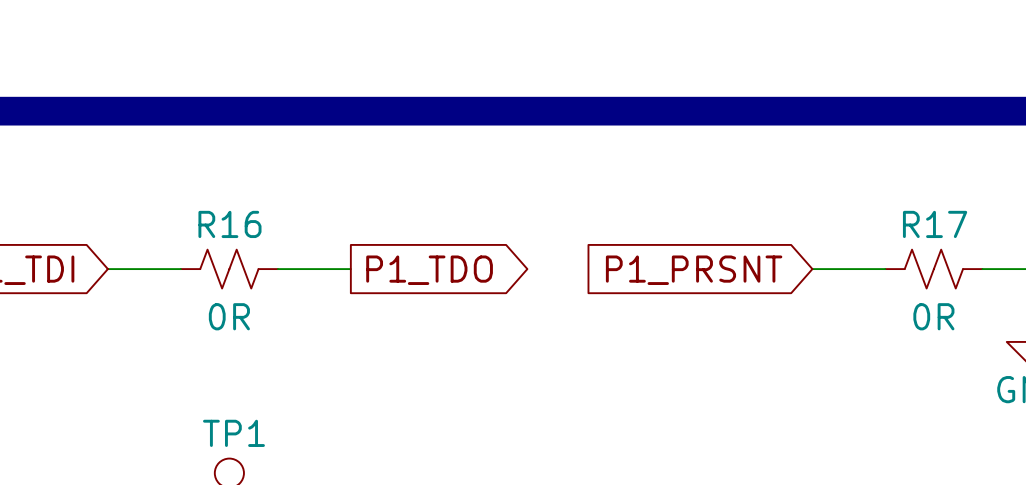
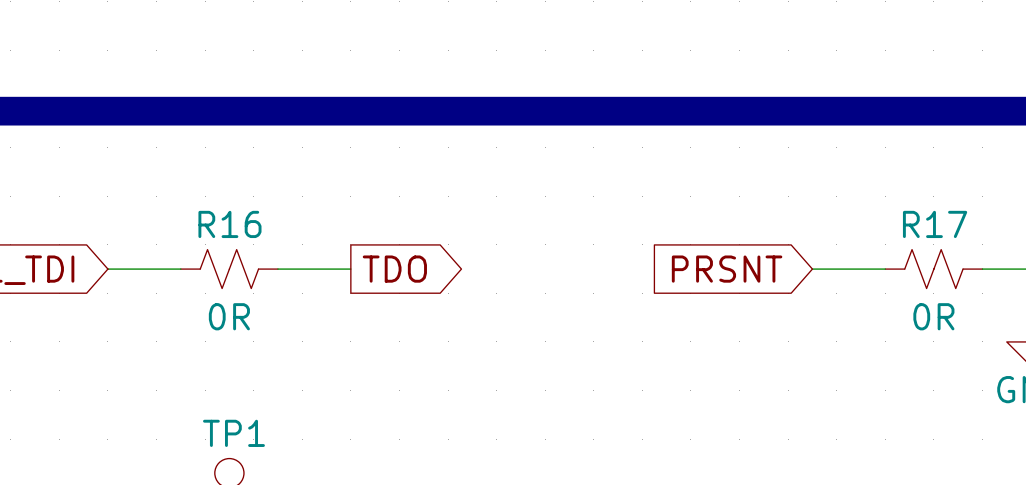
global label: P1_TDO (429, 270) -> TDO (394, 269)
global label: P1_PRSNT (694, 270) -> PRSNT (727, 269)

